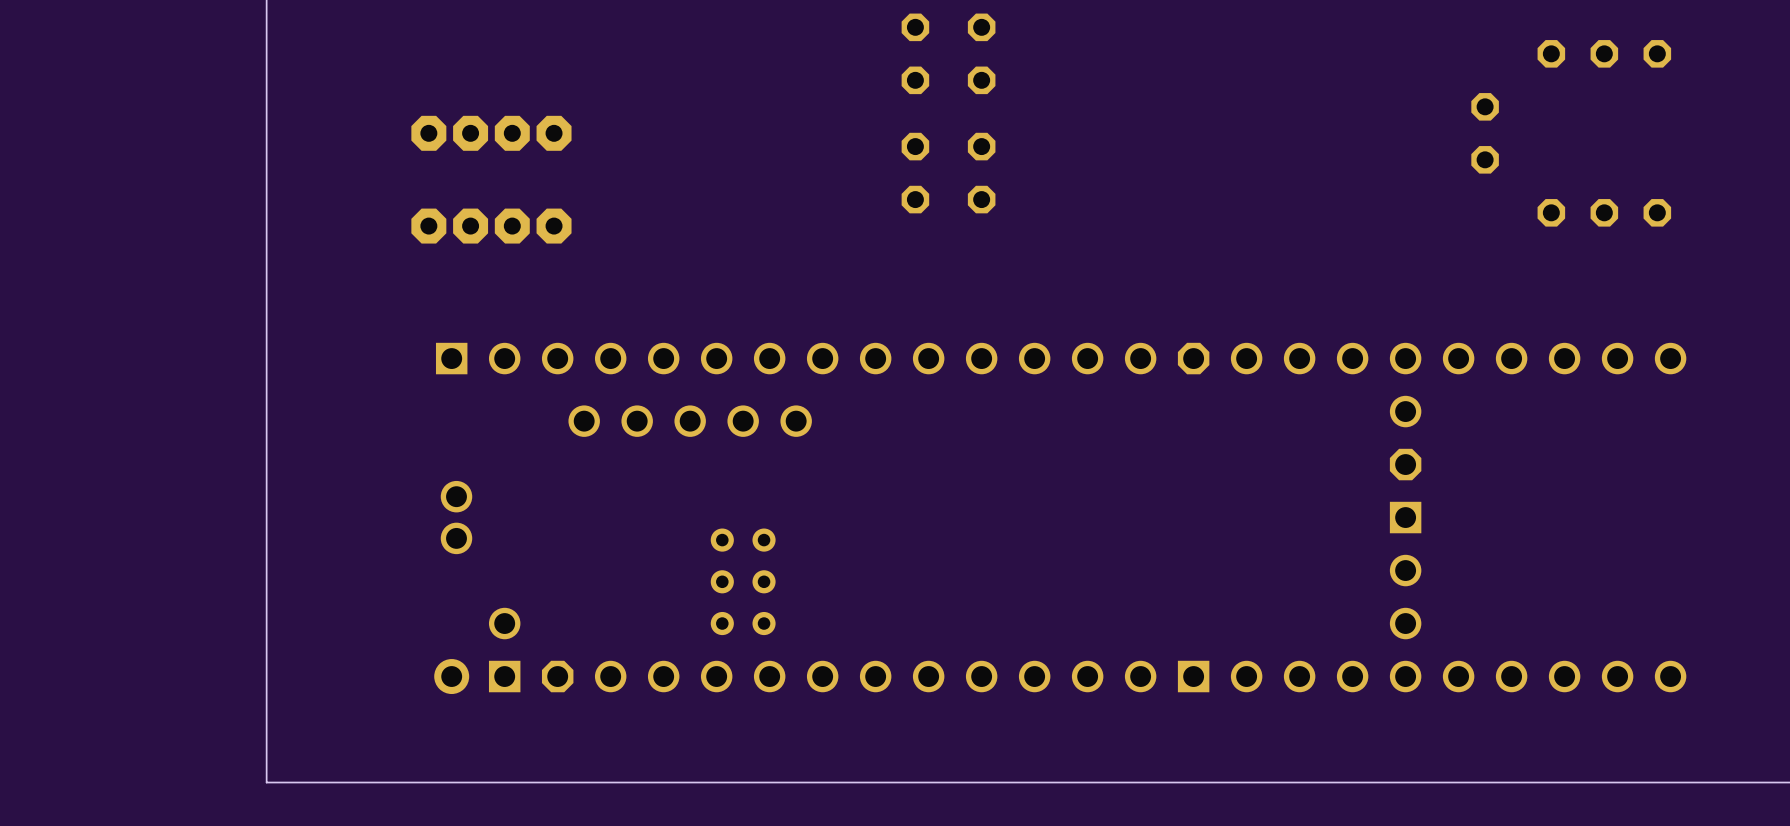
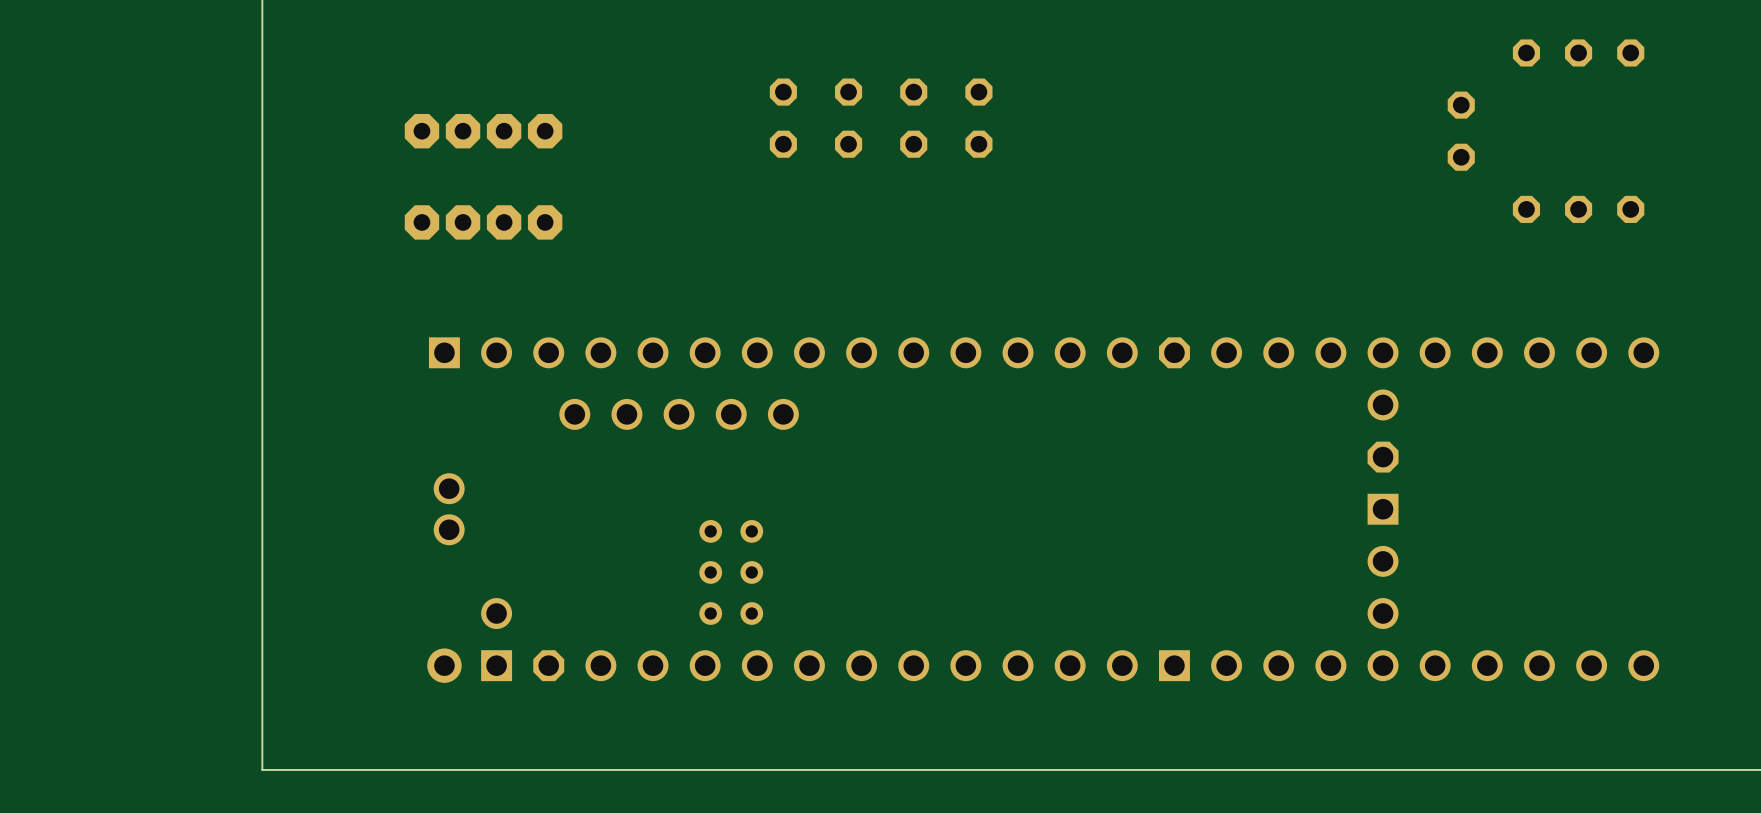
part: (915, 53) -> none
part: (981, 53) -> none
part: none -> (783, 118)
part: none -> (848, 118)
part: none -> (913, 118)
part: none -> (978, 118)
part: (915, 173) -> none
part: (981, 173) -> none

